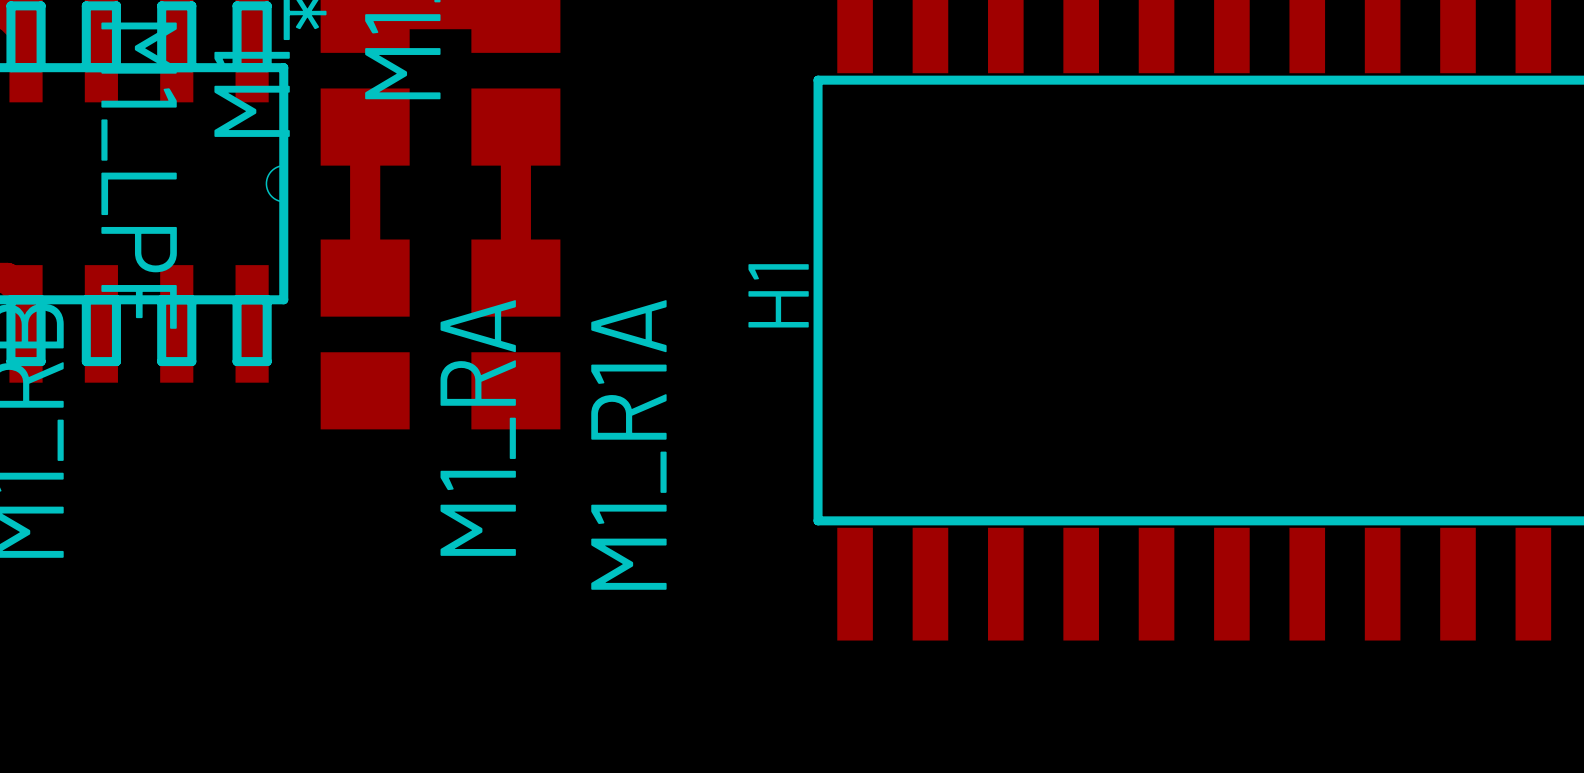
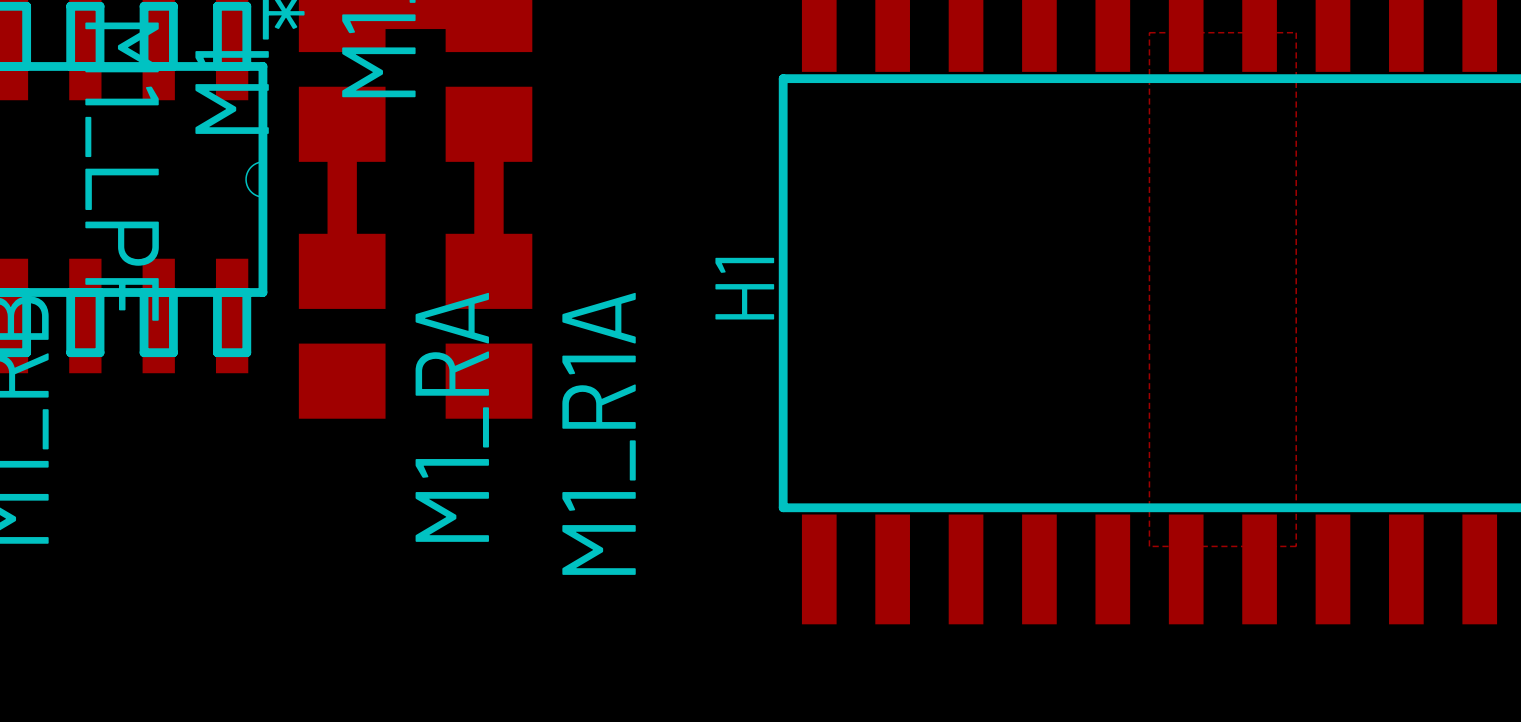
zone outline: none -> (1149, 32) (1149, 546) (1296, 546) (1296, 32) (1149, 32)

